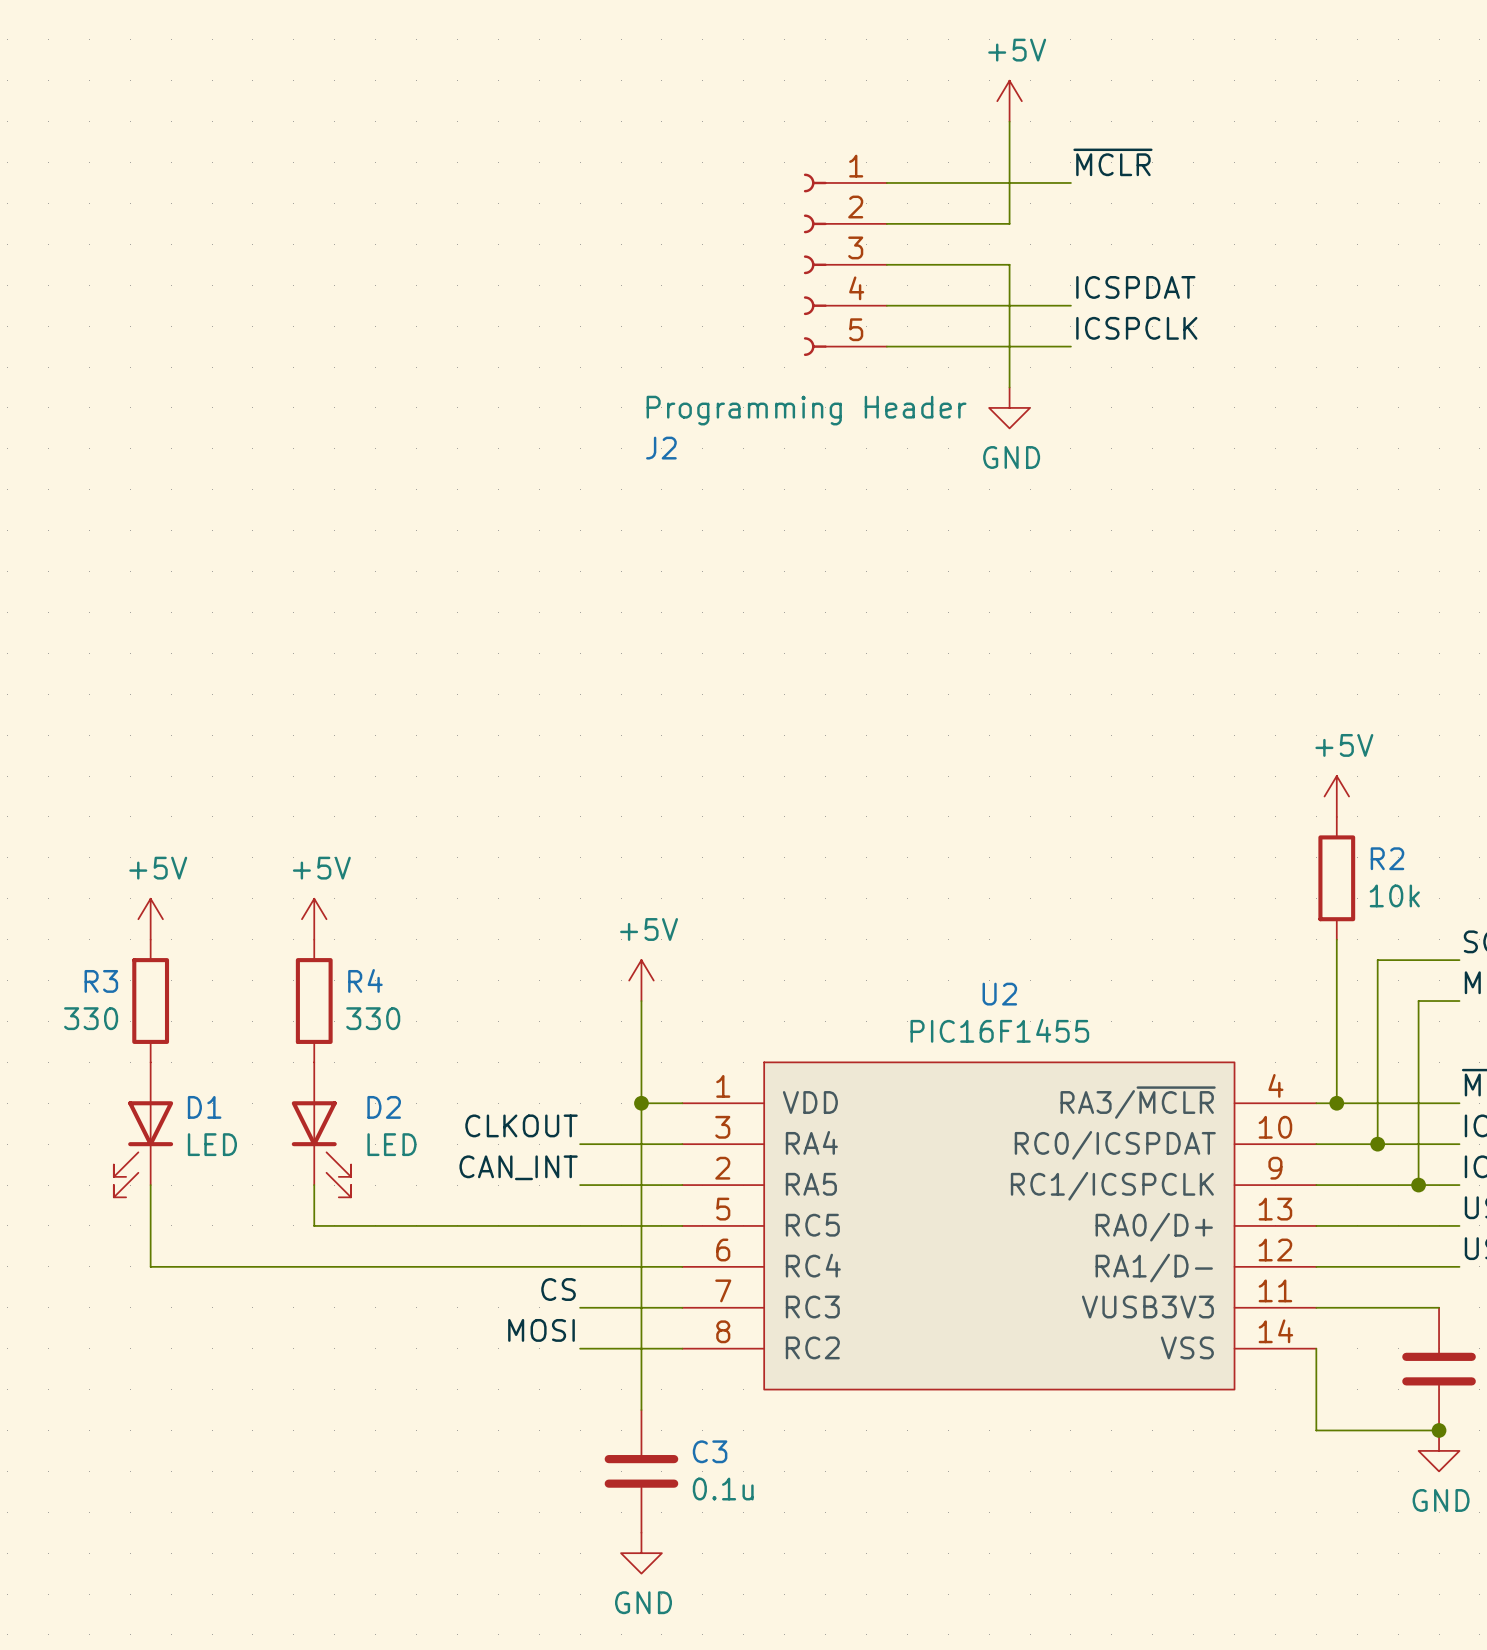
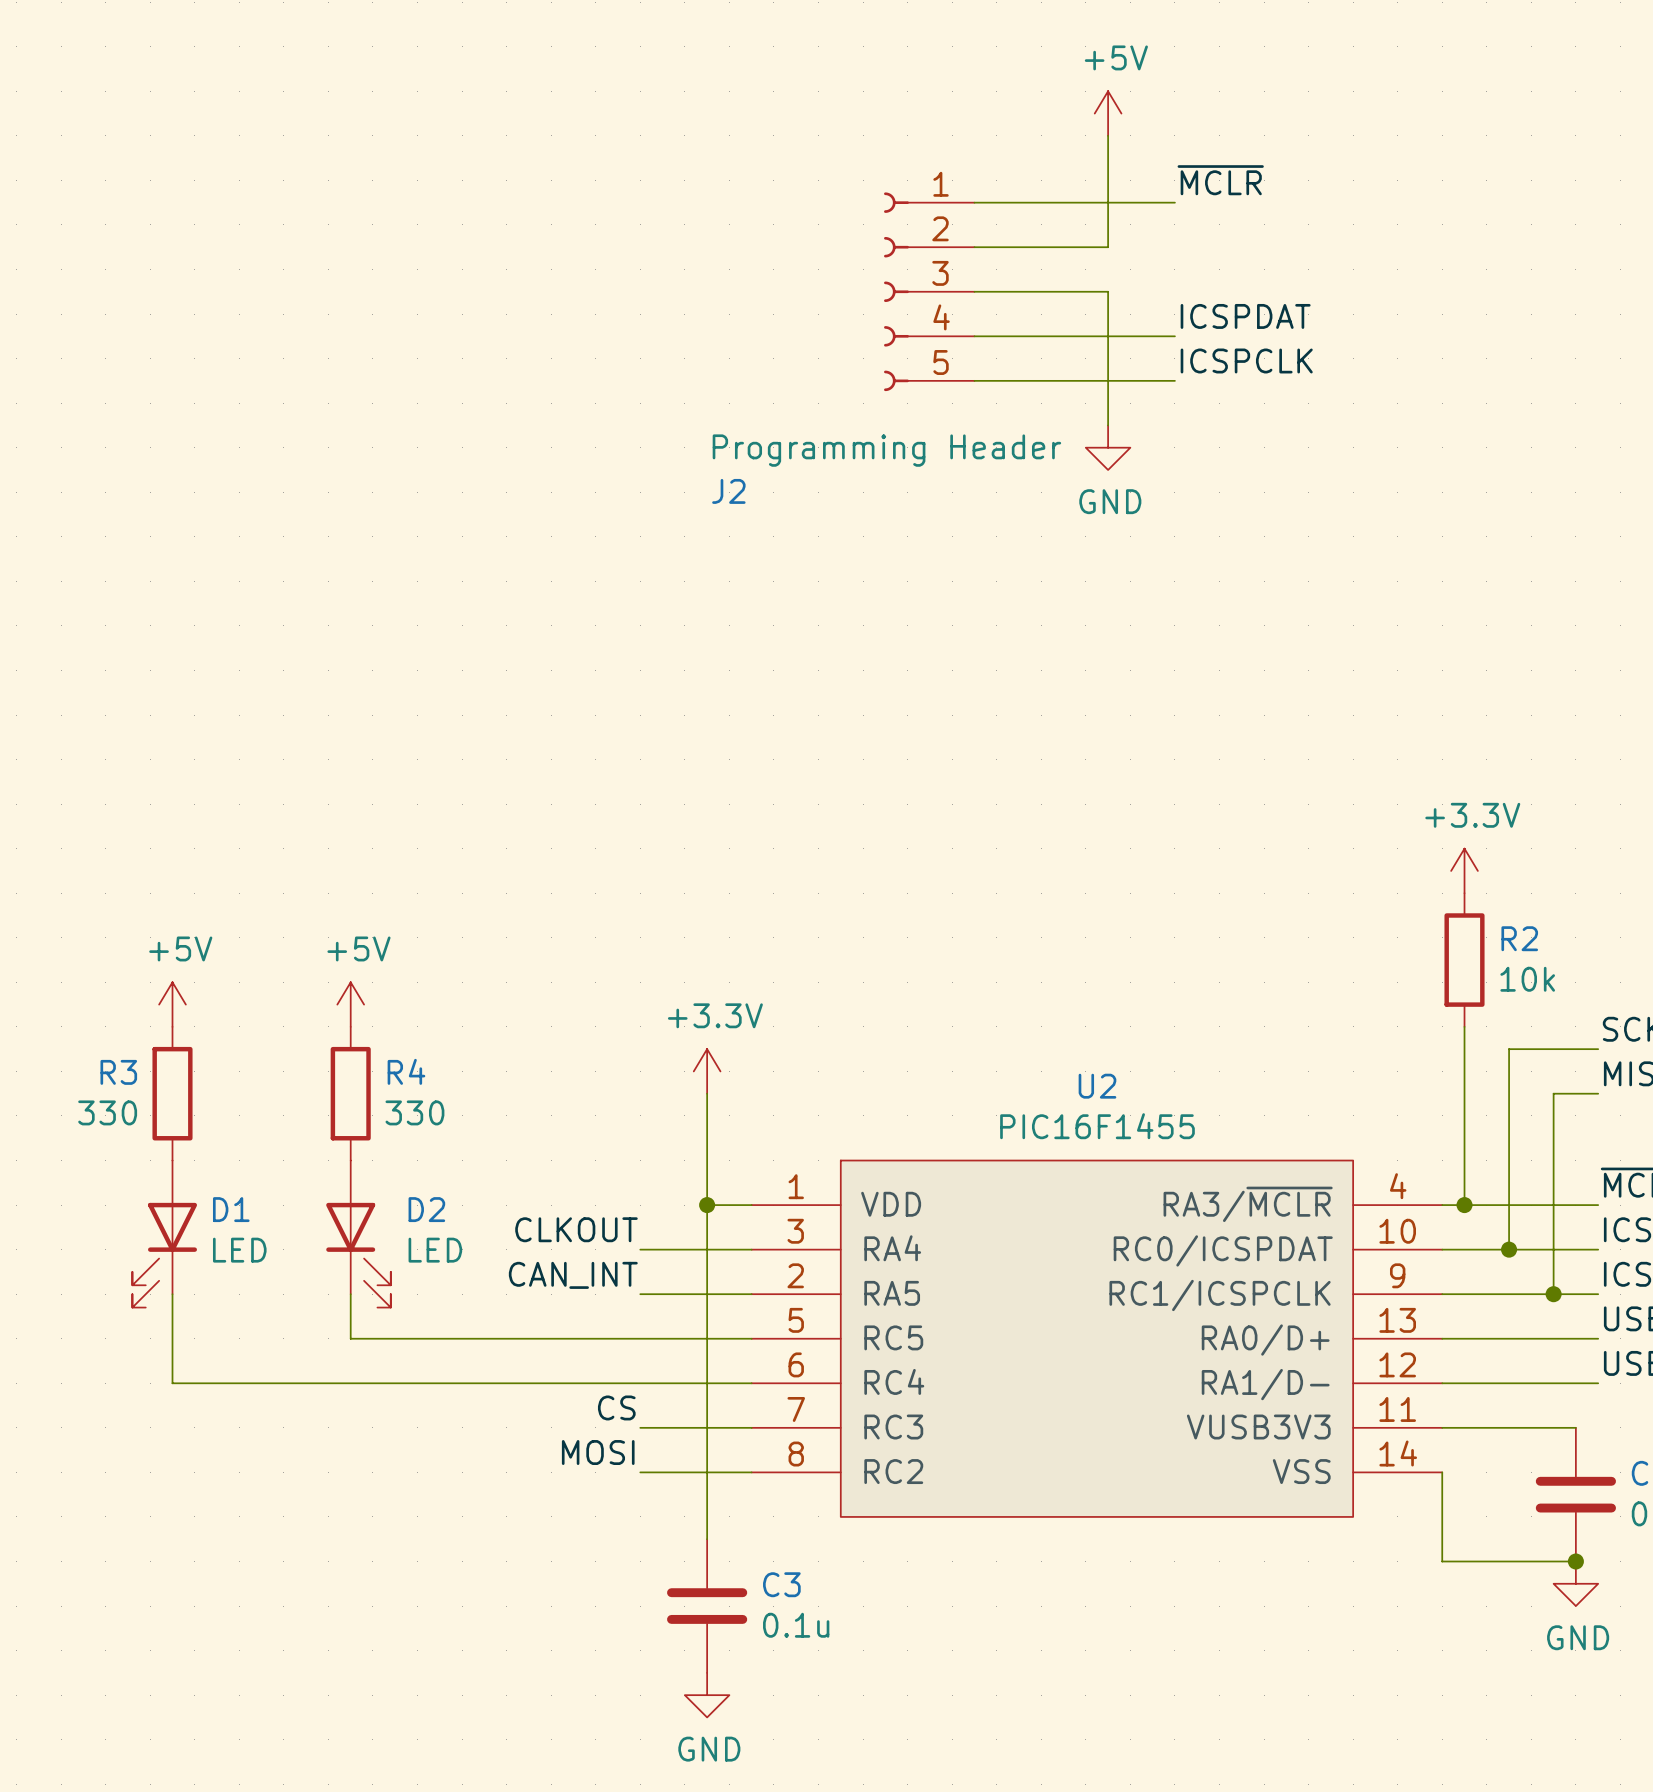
power symbol: +5V (1336, 796) -> +3.3V (1464, 870)
power symbol: +5V (641, 980) -> +3.3V (707, 1071)

